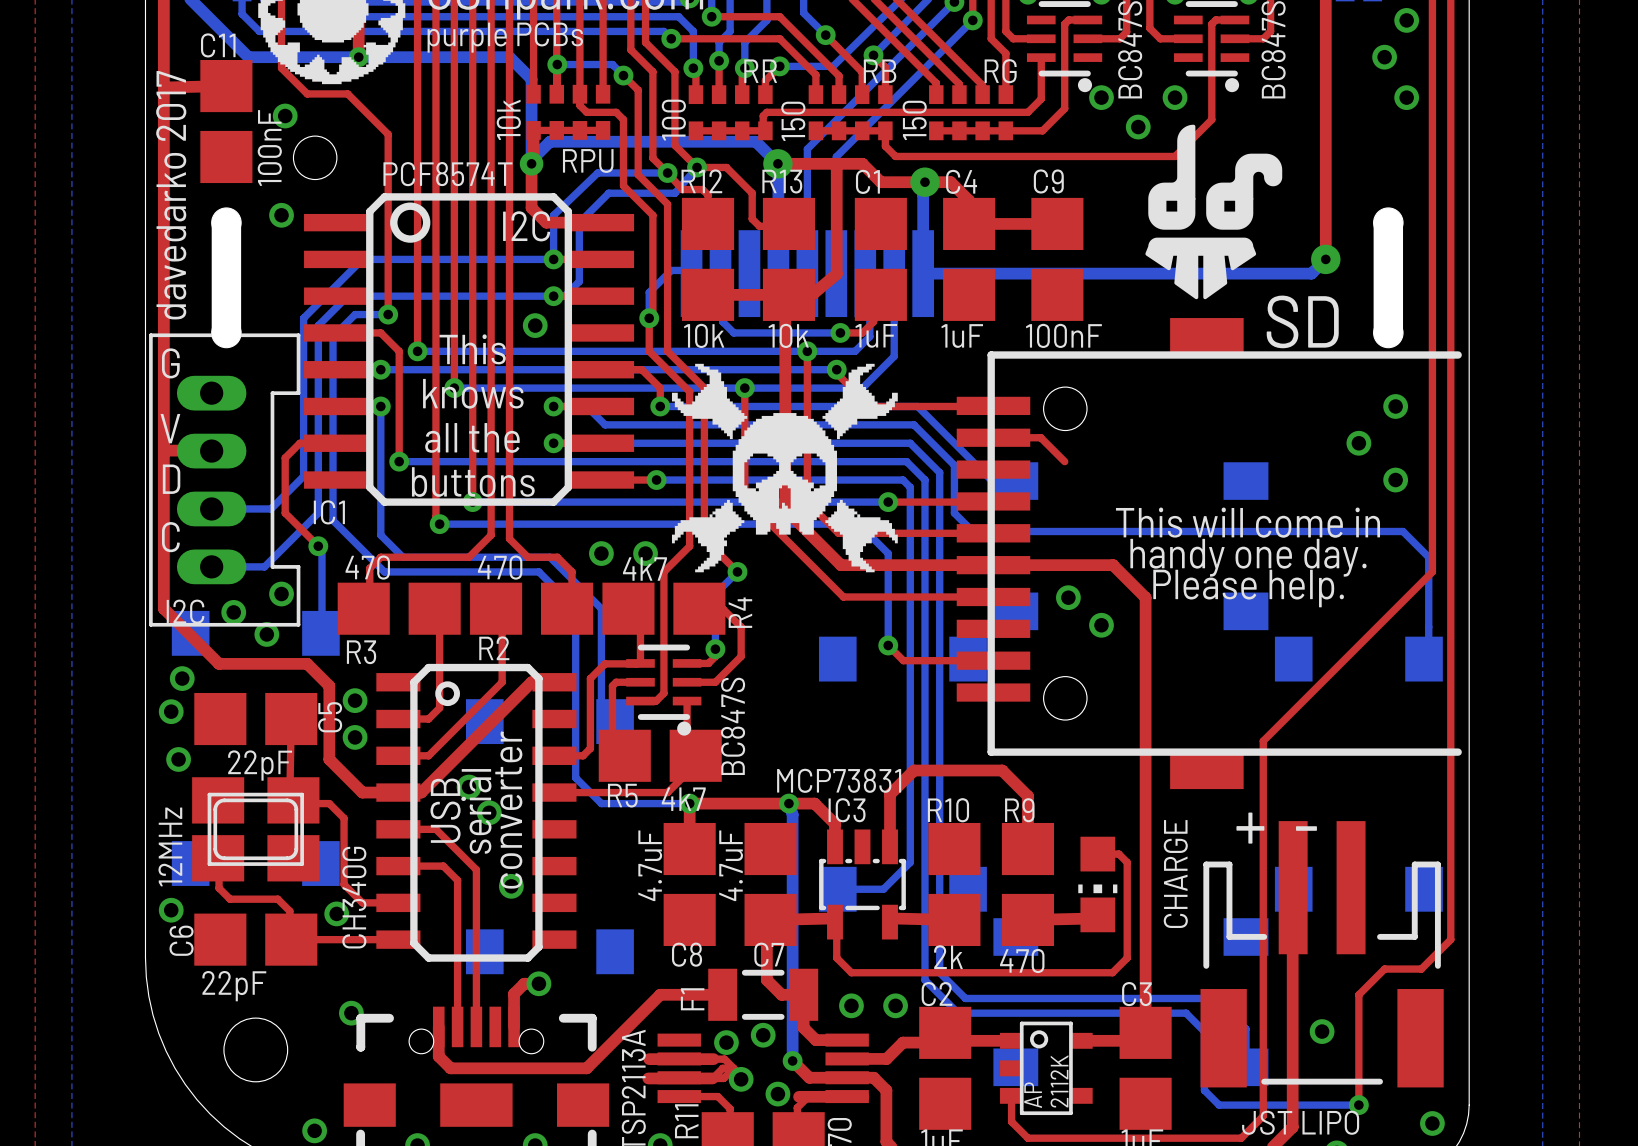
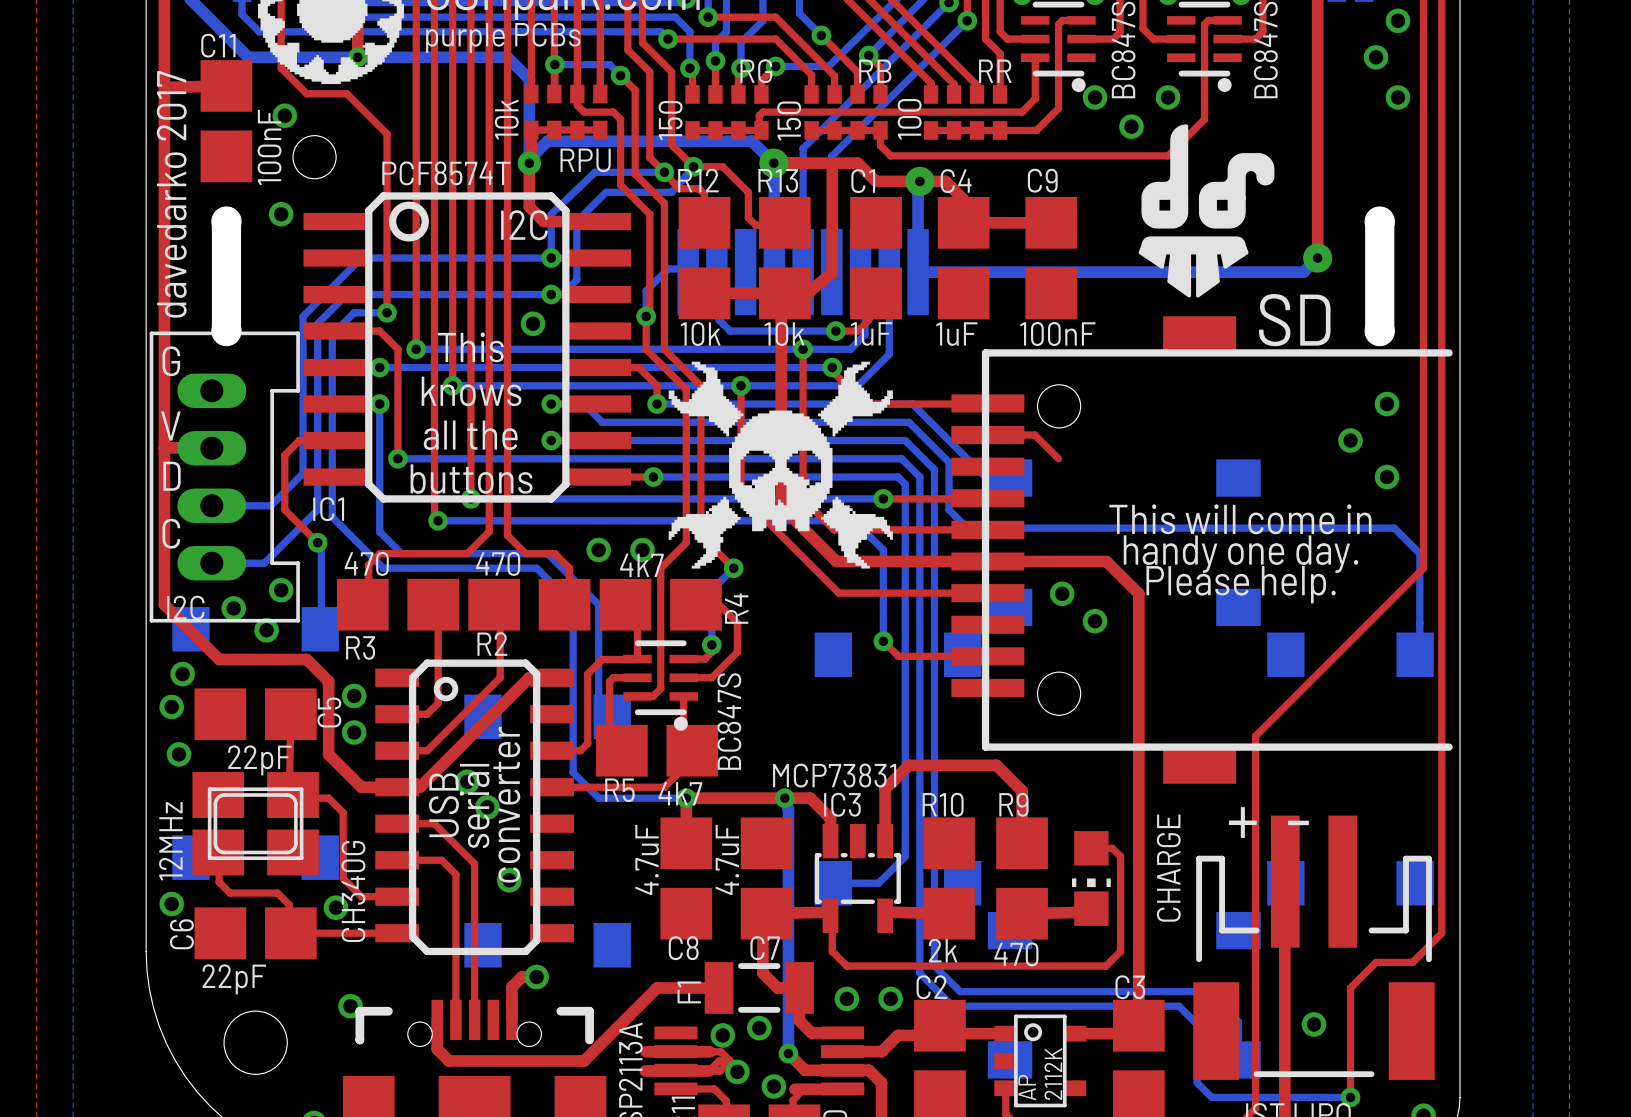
RR name: RR (760, 71) -> RG (756, 71)
RG name: RG (1000, 71) -> RR (995, 71)
RR value: 100 (673, 120) -> 150 (670, 120)
RG value: 150 (914, 120) -> 100 (909, 119)

